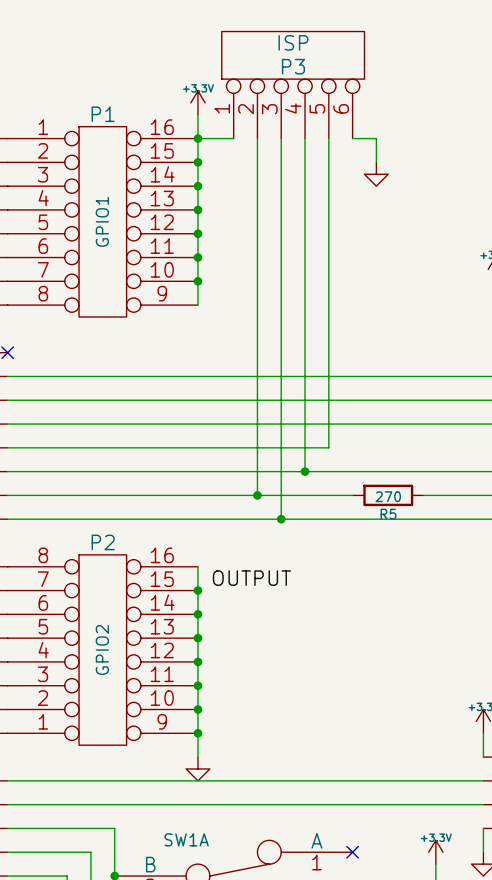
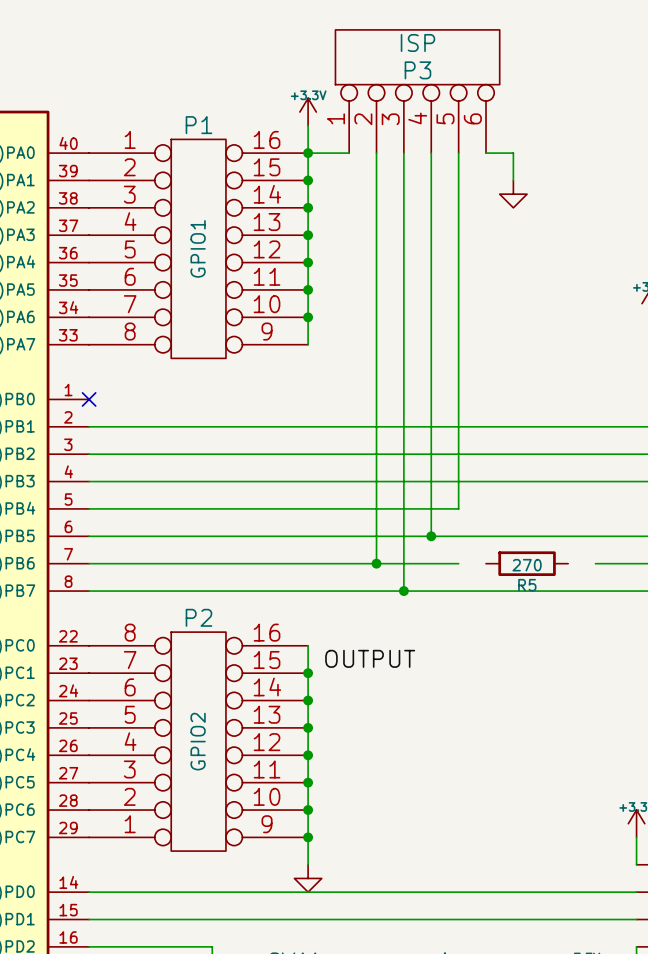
wire: (328, 495) (352, 495) -> none
wire: (423, 495) (447, 495) -> none

